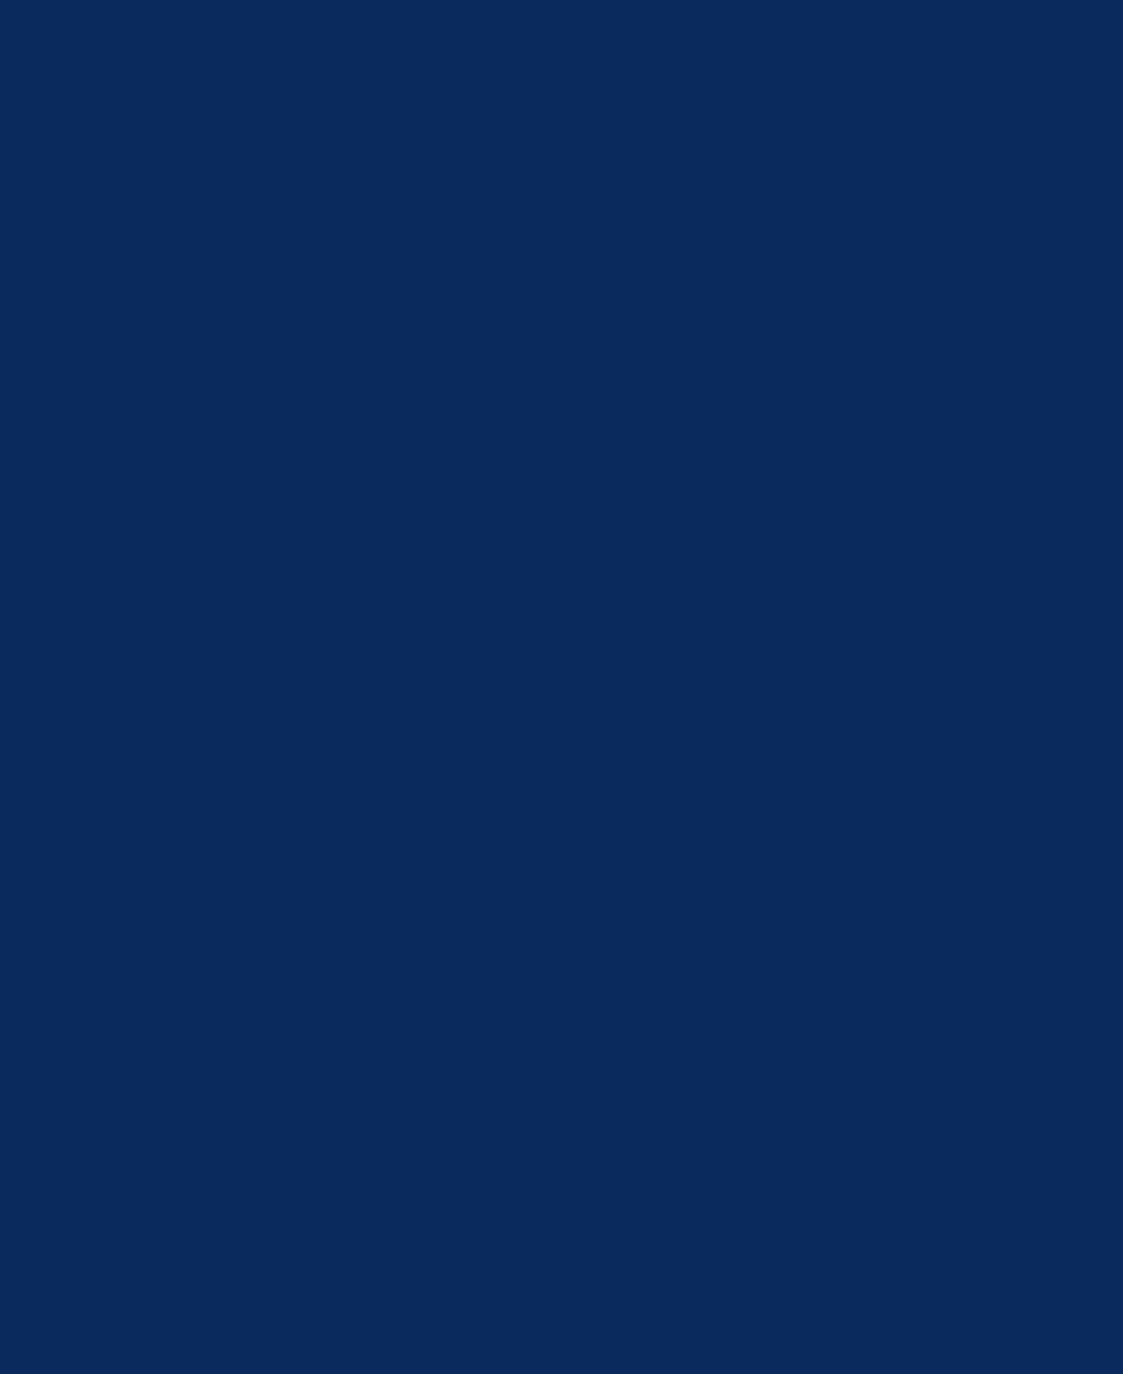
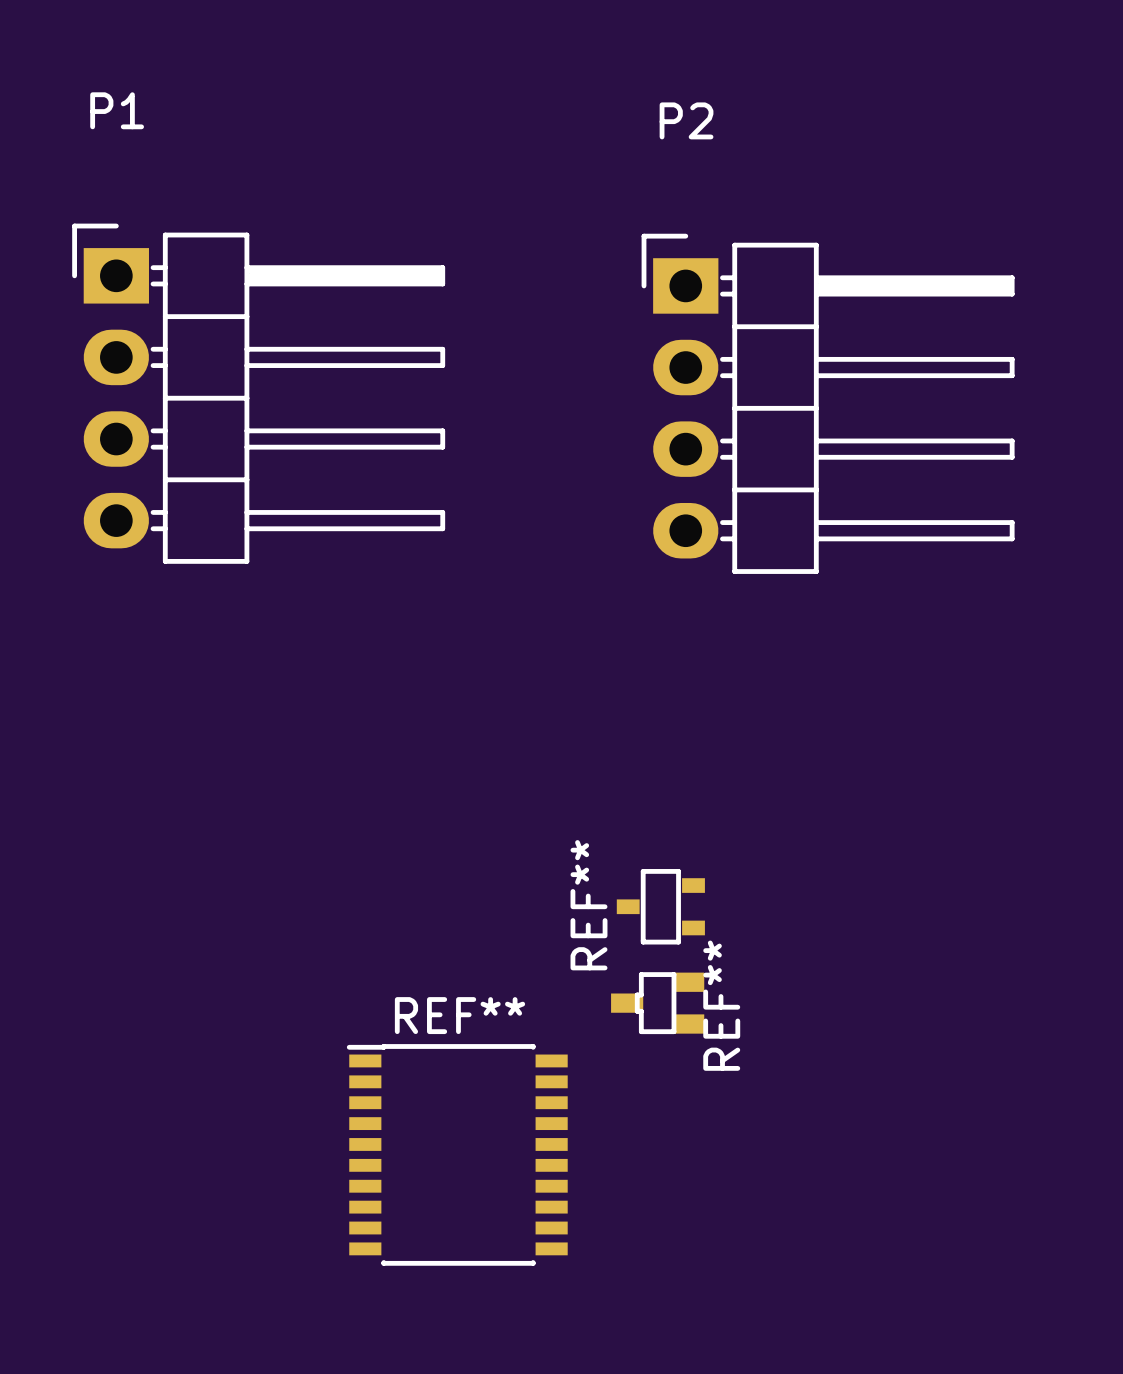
P1: none -> (258, 393)
P2: none -> (828, 403)
REF**: none -> (660, 906)
REF**: none -> (657, 1003)
REF**: none -> (457, 1154)

